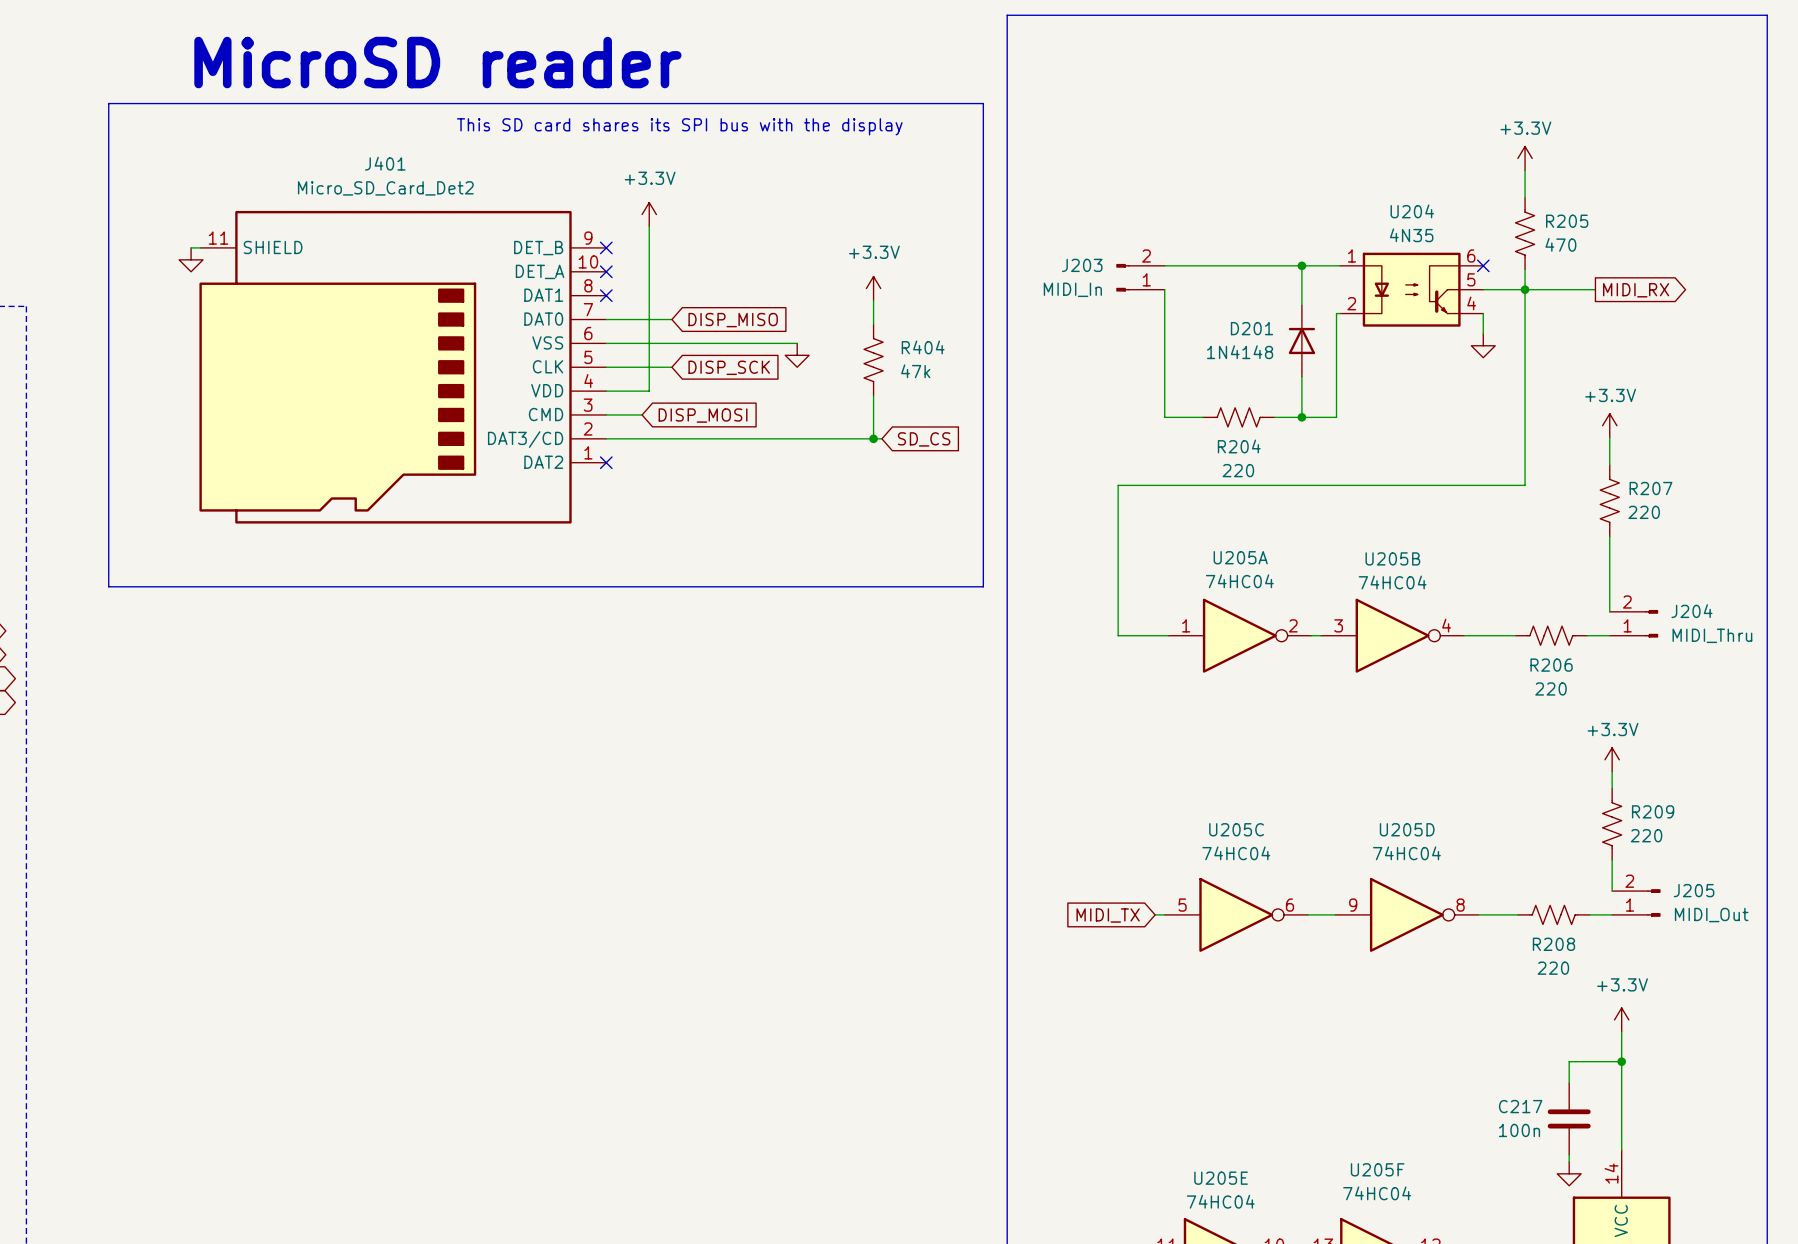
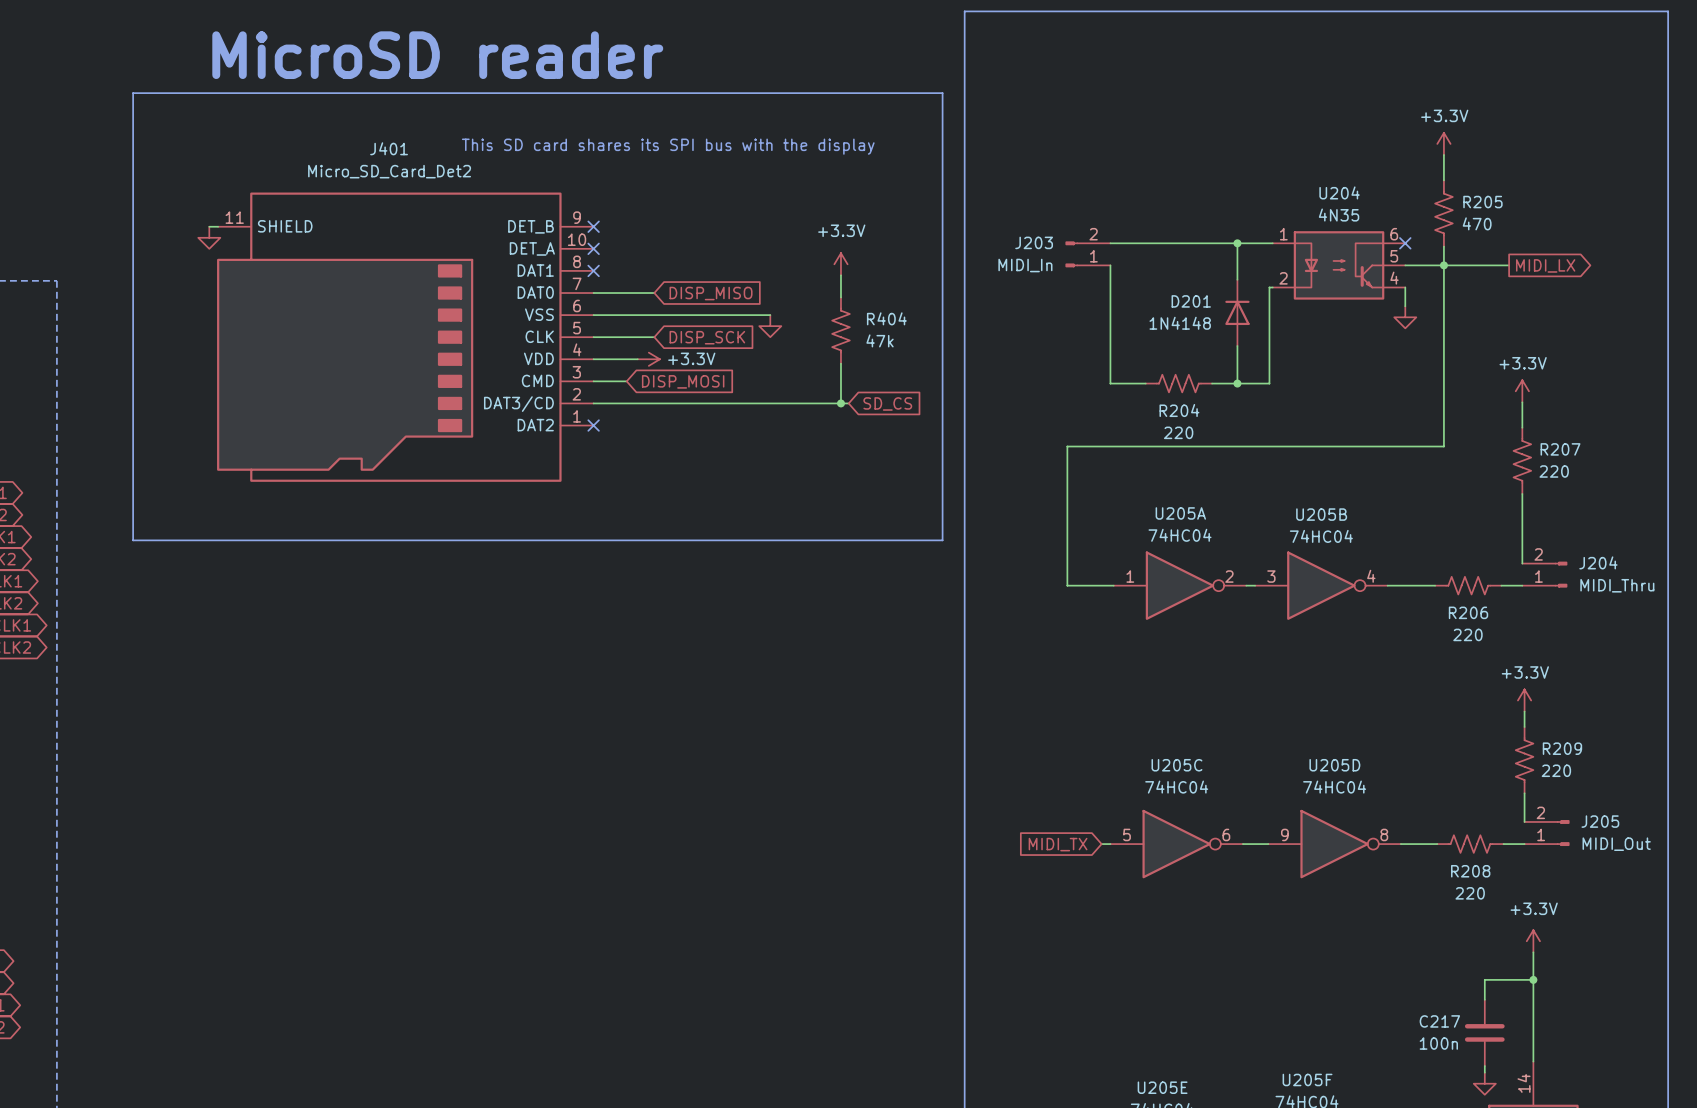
text position: This SD card shares its SPI bus with the display (679, 126) -> This SD card shares its SPI bus with the display (668, 146)
power symbol rotation: 0° (649, 214) -> 90° clockwise (648, 359)
power symbol position: +3.3V (649, 214) -> +3.3V (648, 359)
wire: (649, 226) (649, 391) -> (637, 359) (633, 359)
global label: MIDI_RX (1636, 290) -> MIDI_LX (1545, 265)

